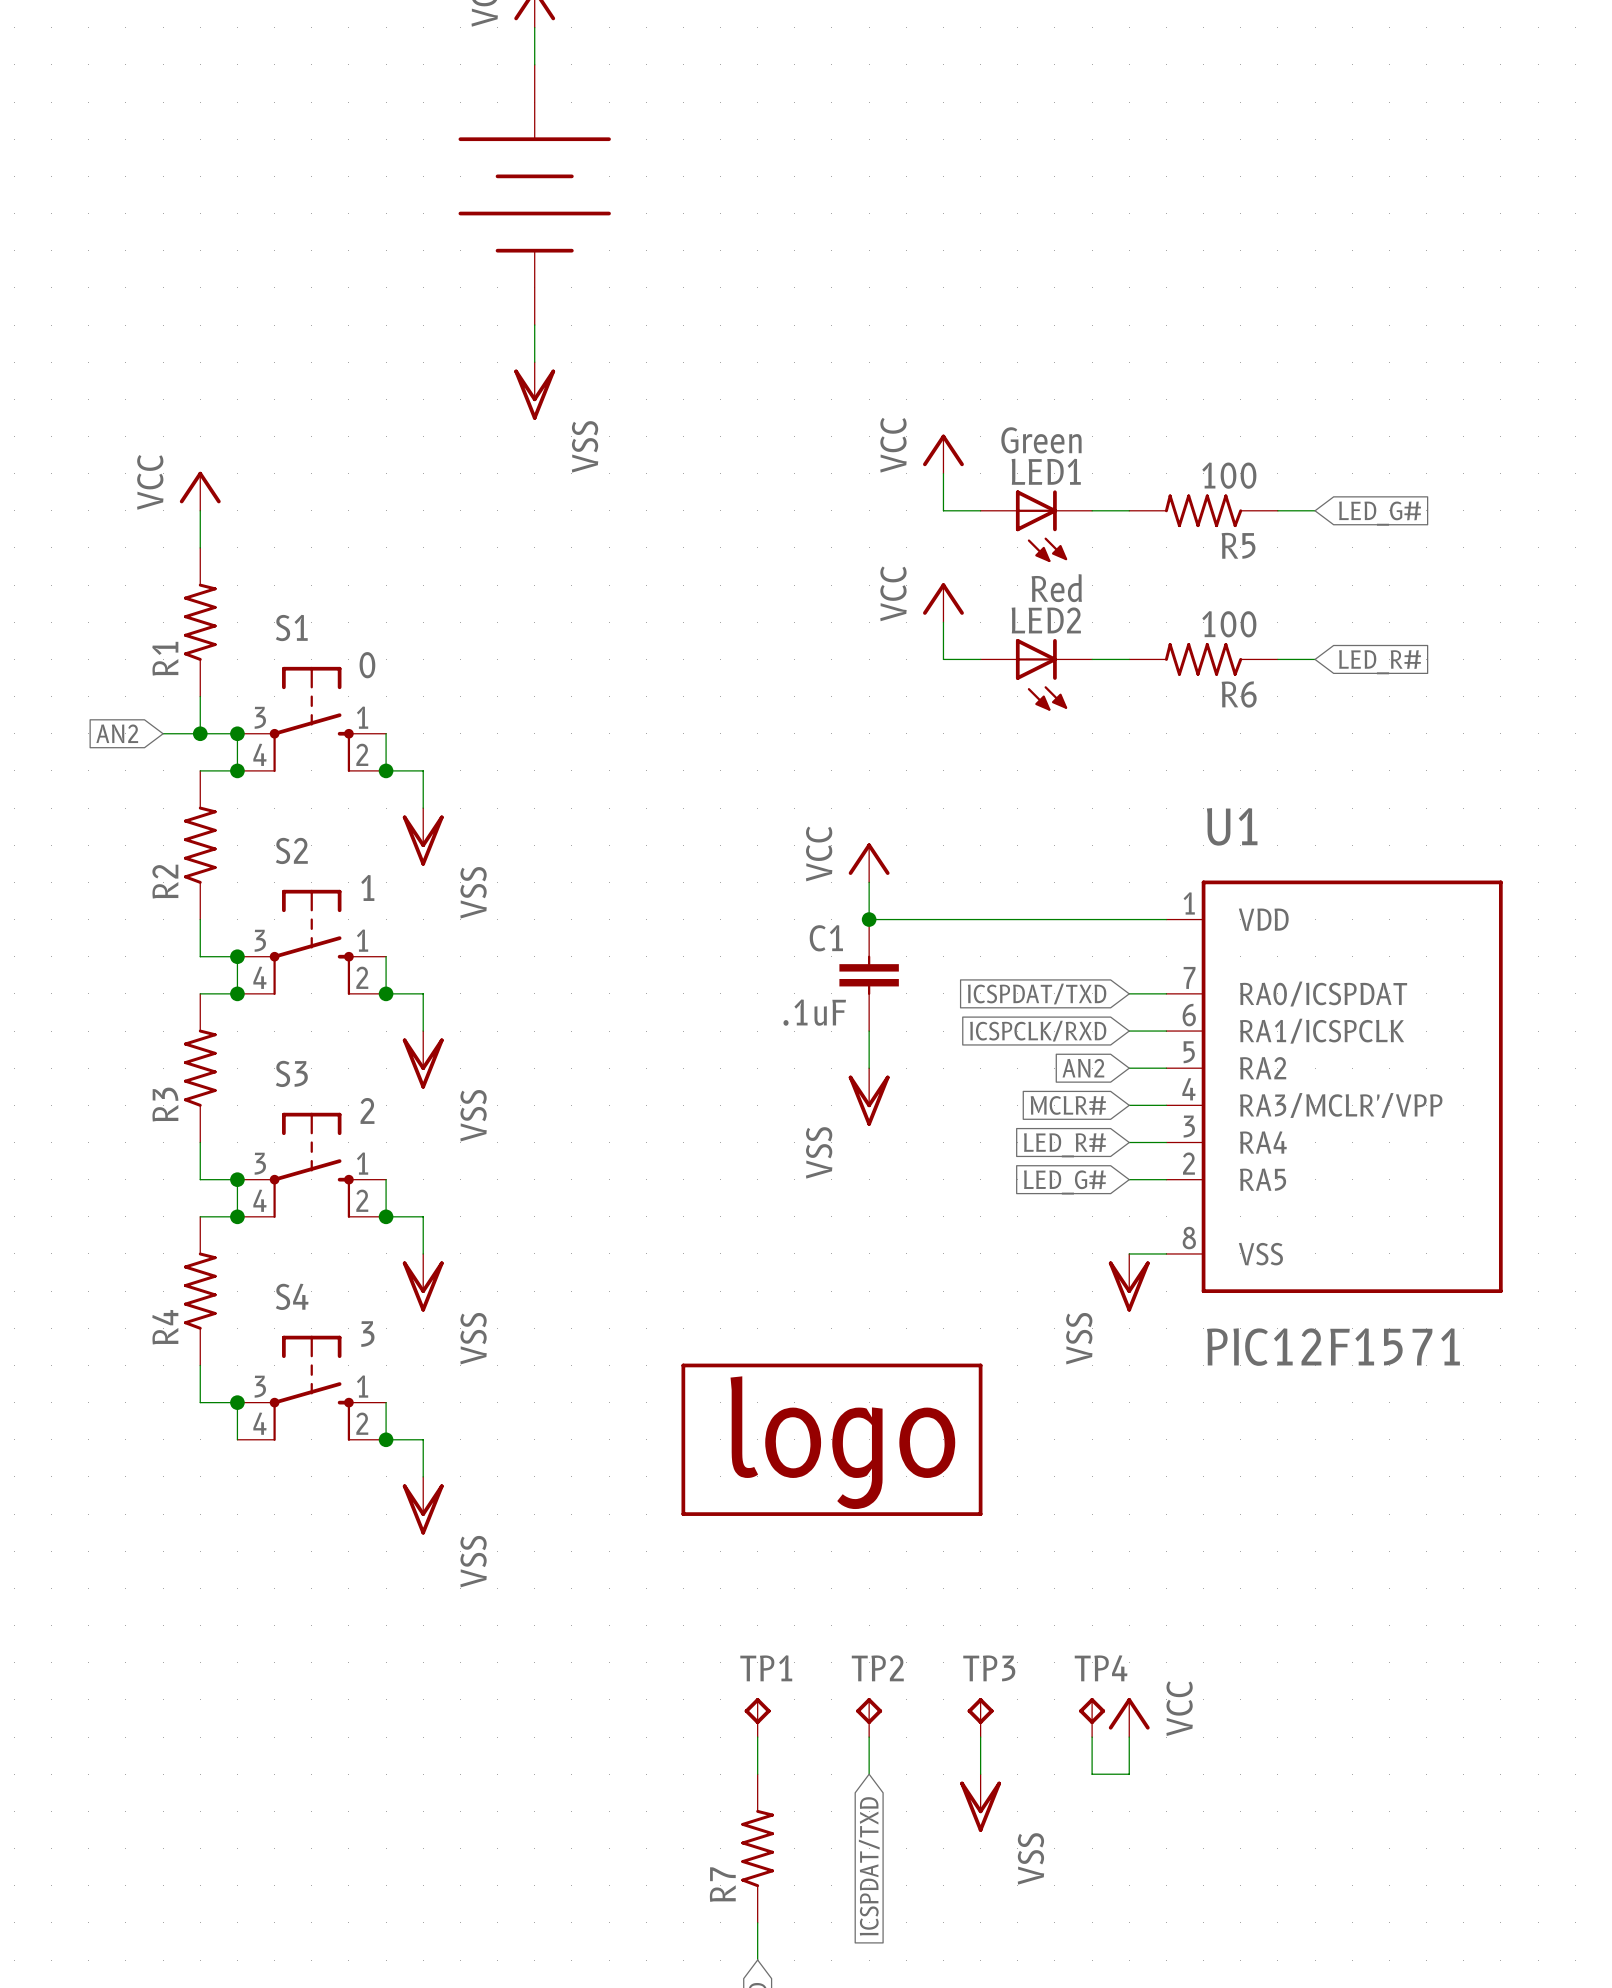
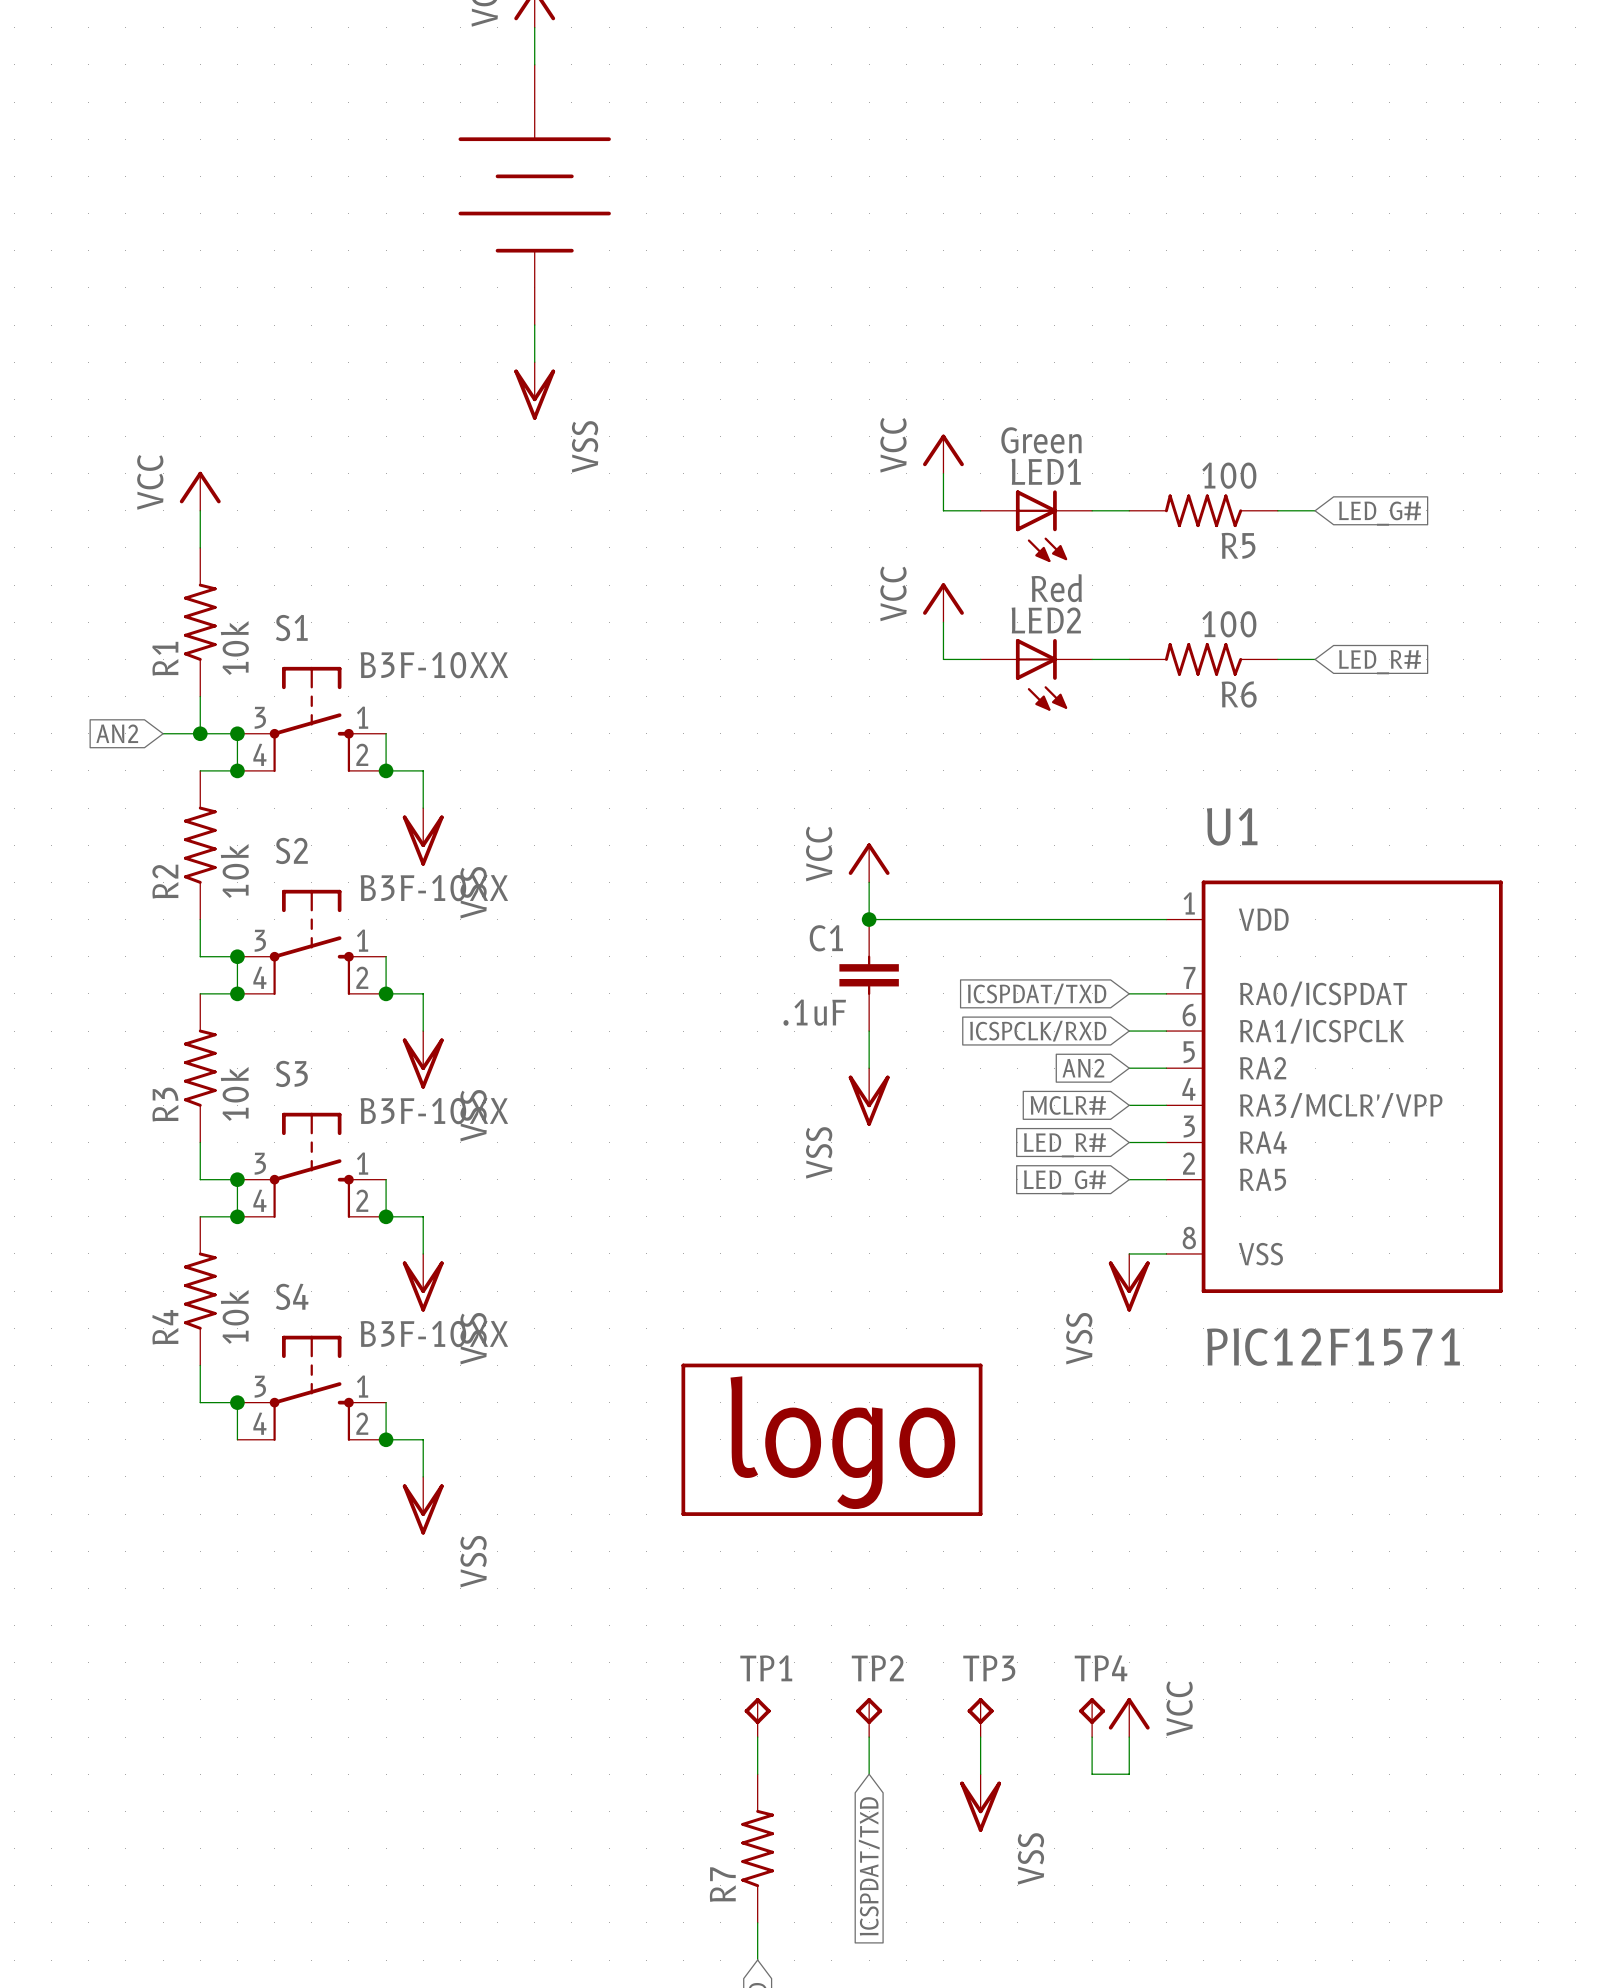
R1 value: none -> 10k (234, 648)
S1 value: 0 (367, 665) -> B3F-10XX (434, 665)
R2 value: none -> 10k (234, 870)
S2 value: 1 (367, 887) -> B3F-10XX (434, 888)
R3 value: none -> 10k (234, 1093)
S3 value: 2 (367, 1110) -> B3F-10XX (434, 1111)
R4 value: none -> 10k (234, 1316)
S4 value: 3 (367, 1334) -> B3F-10XX (434, 1334)

